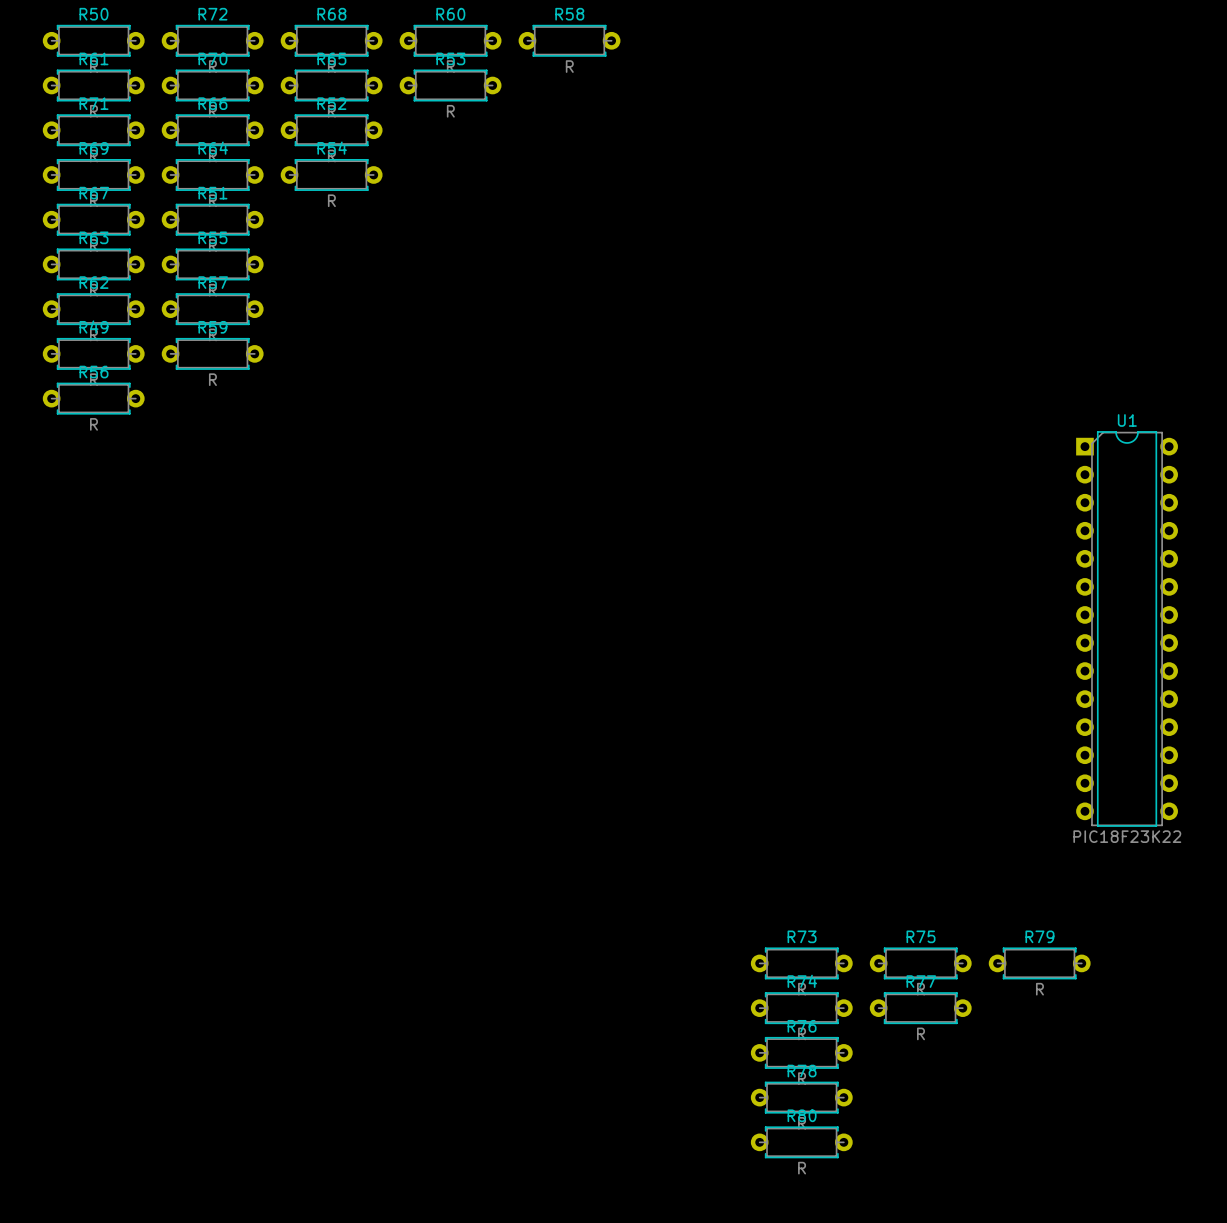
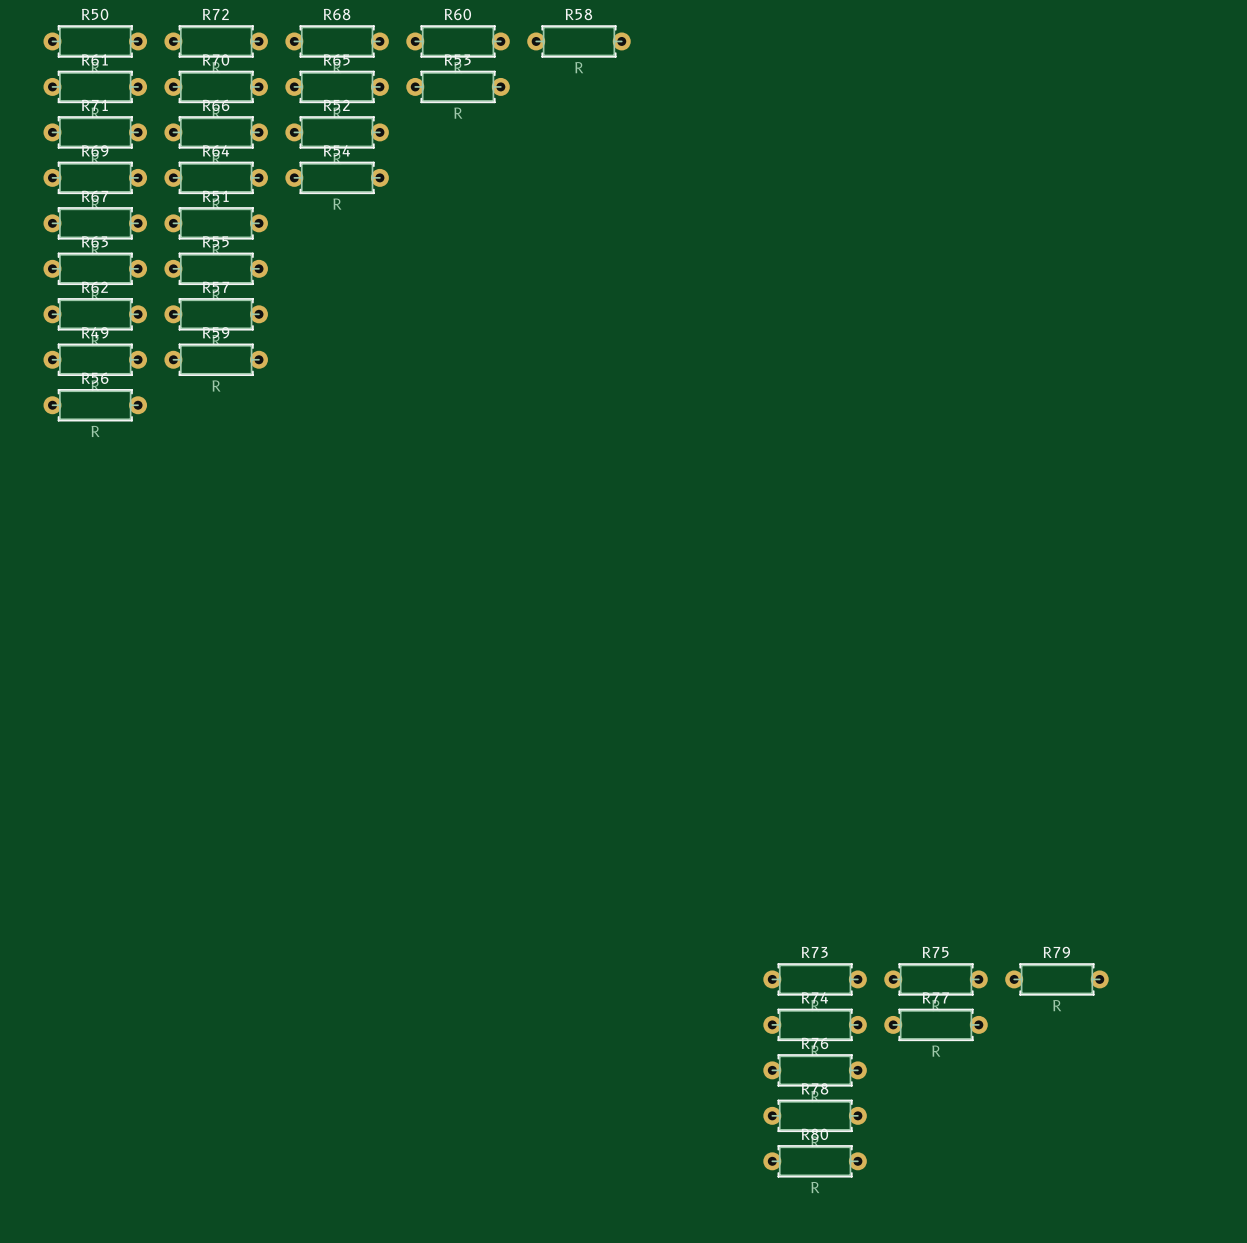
U1: PIC18F23K22 (1127, 628) -> none

